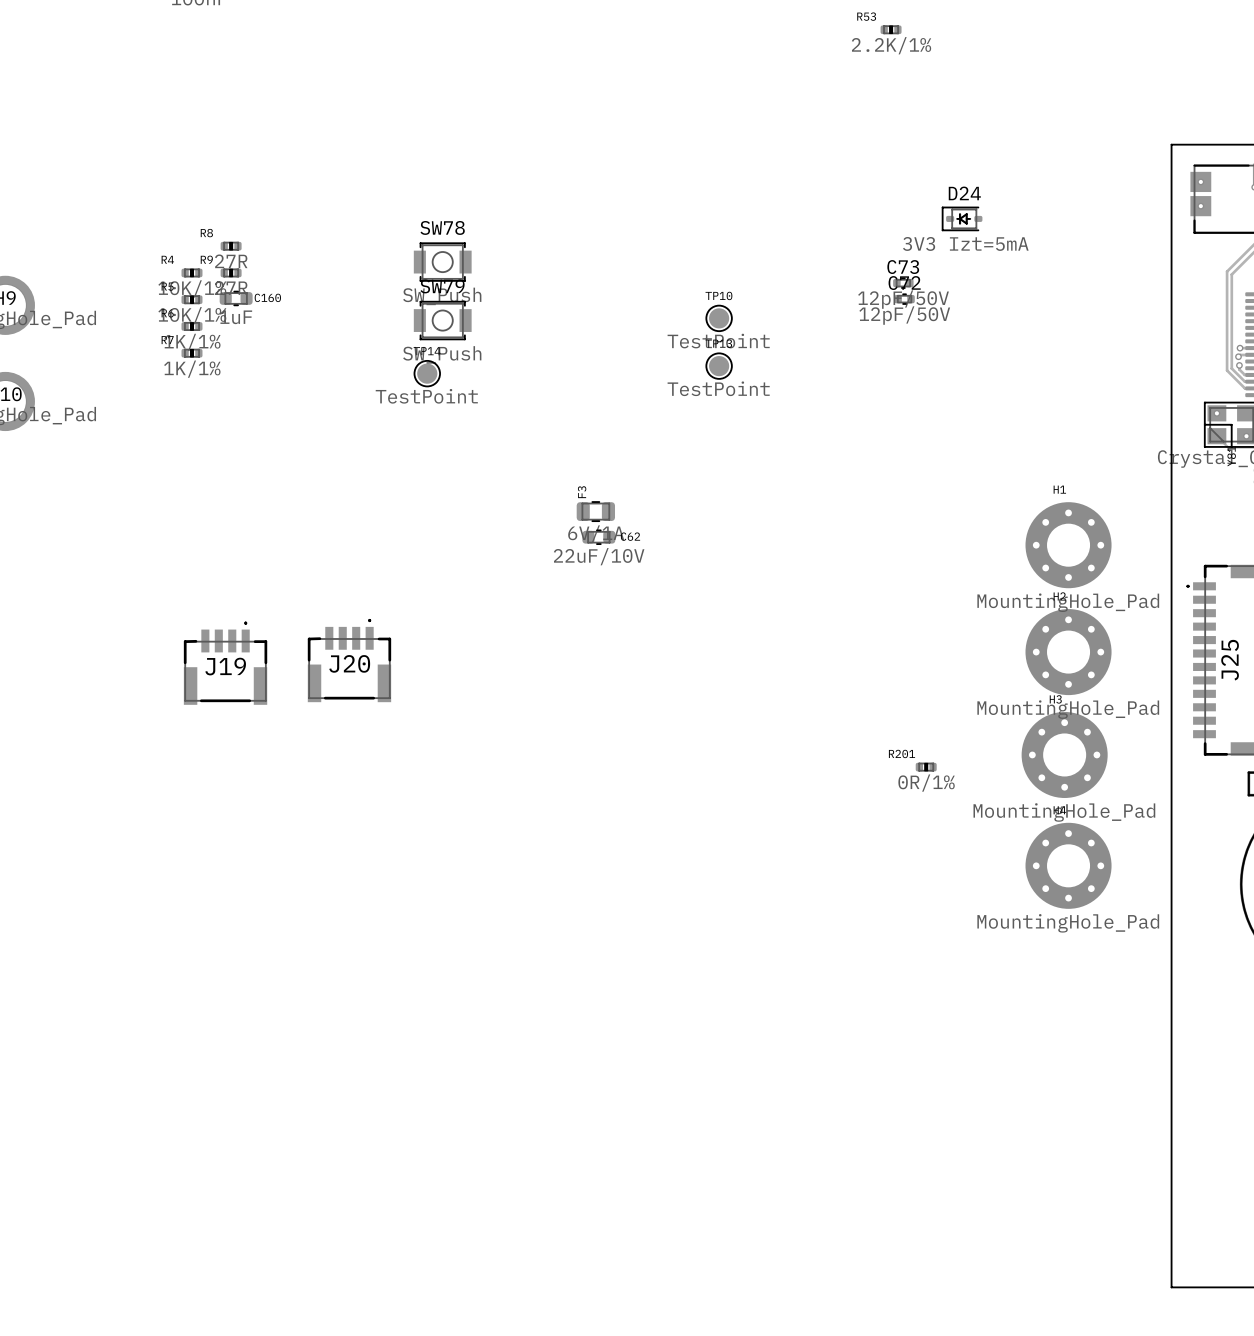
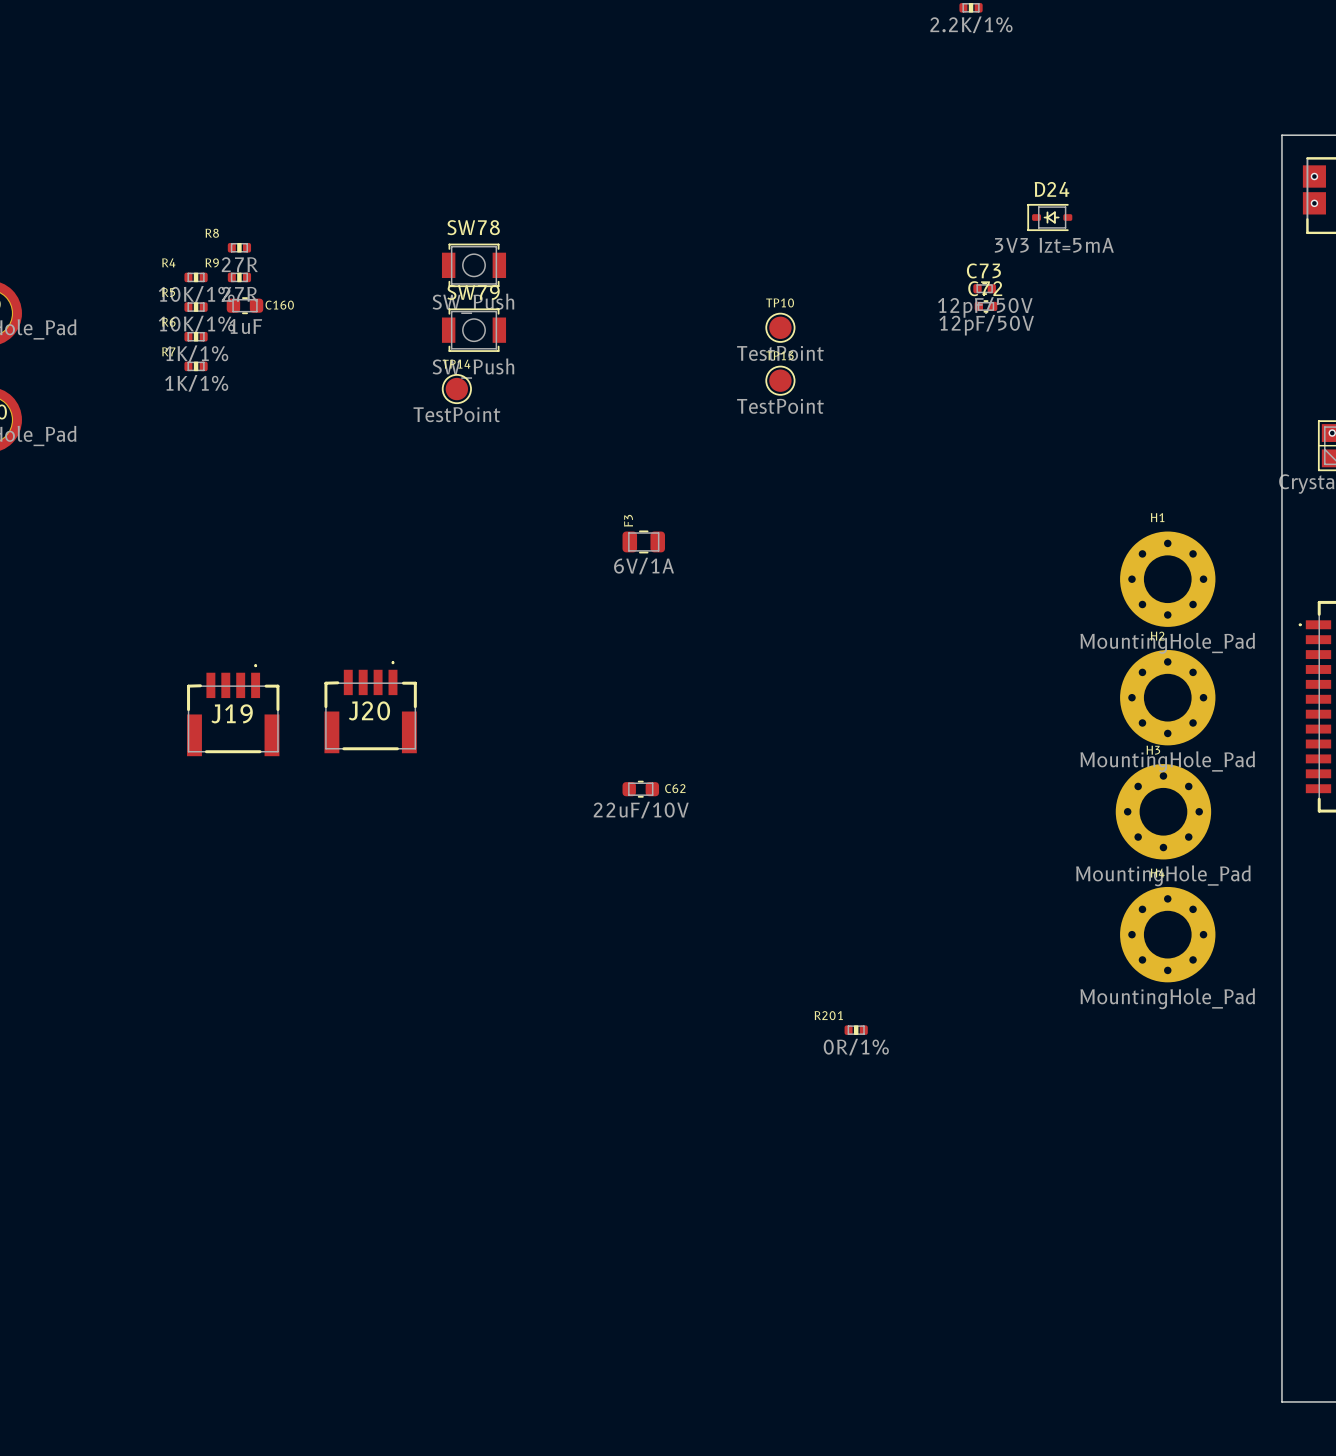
C62 position: (598, 537) -> (640, 789)
R201 position: (926, 767) -> (856, 1030)

